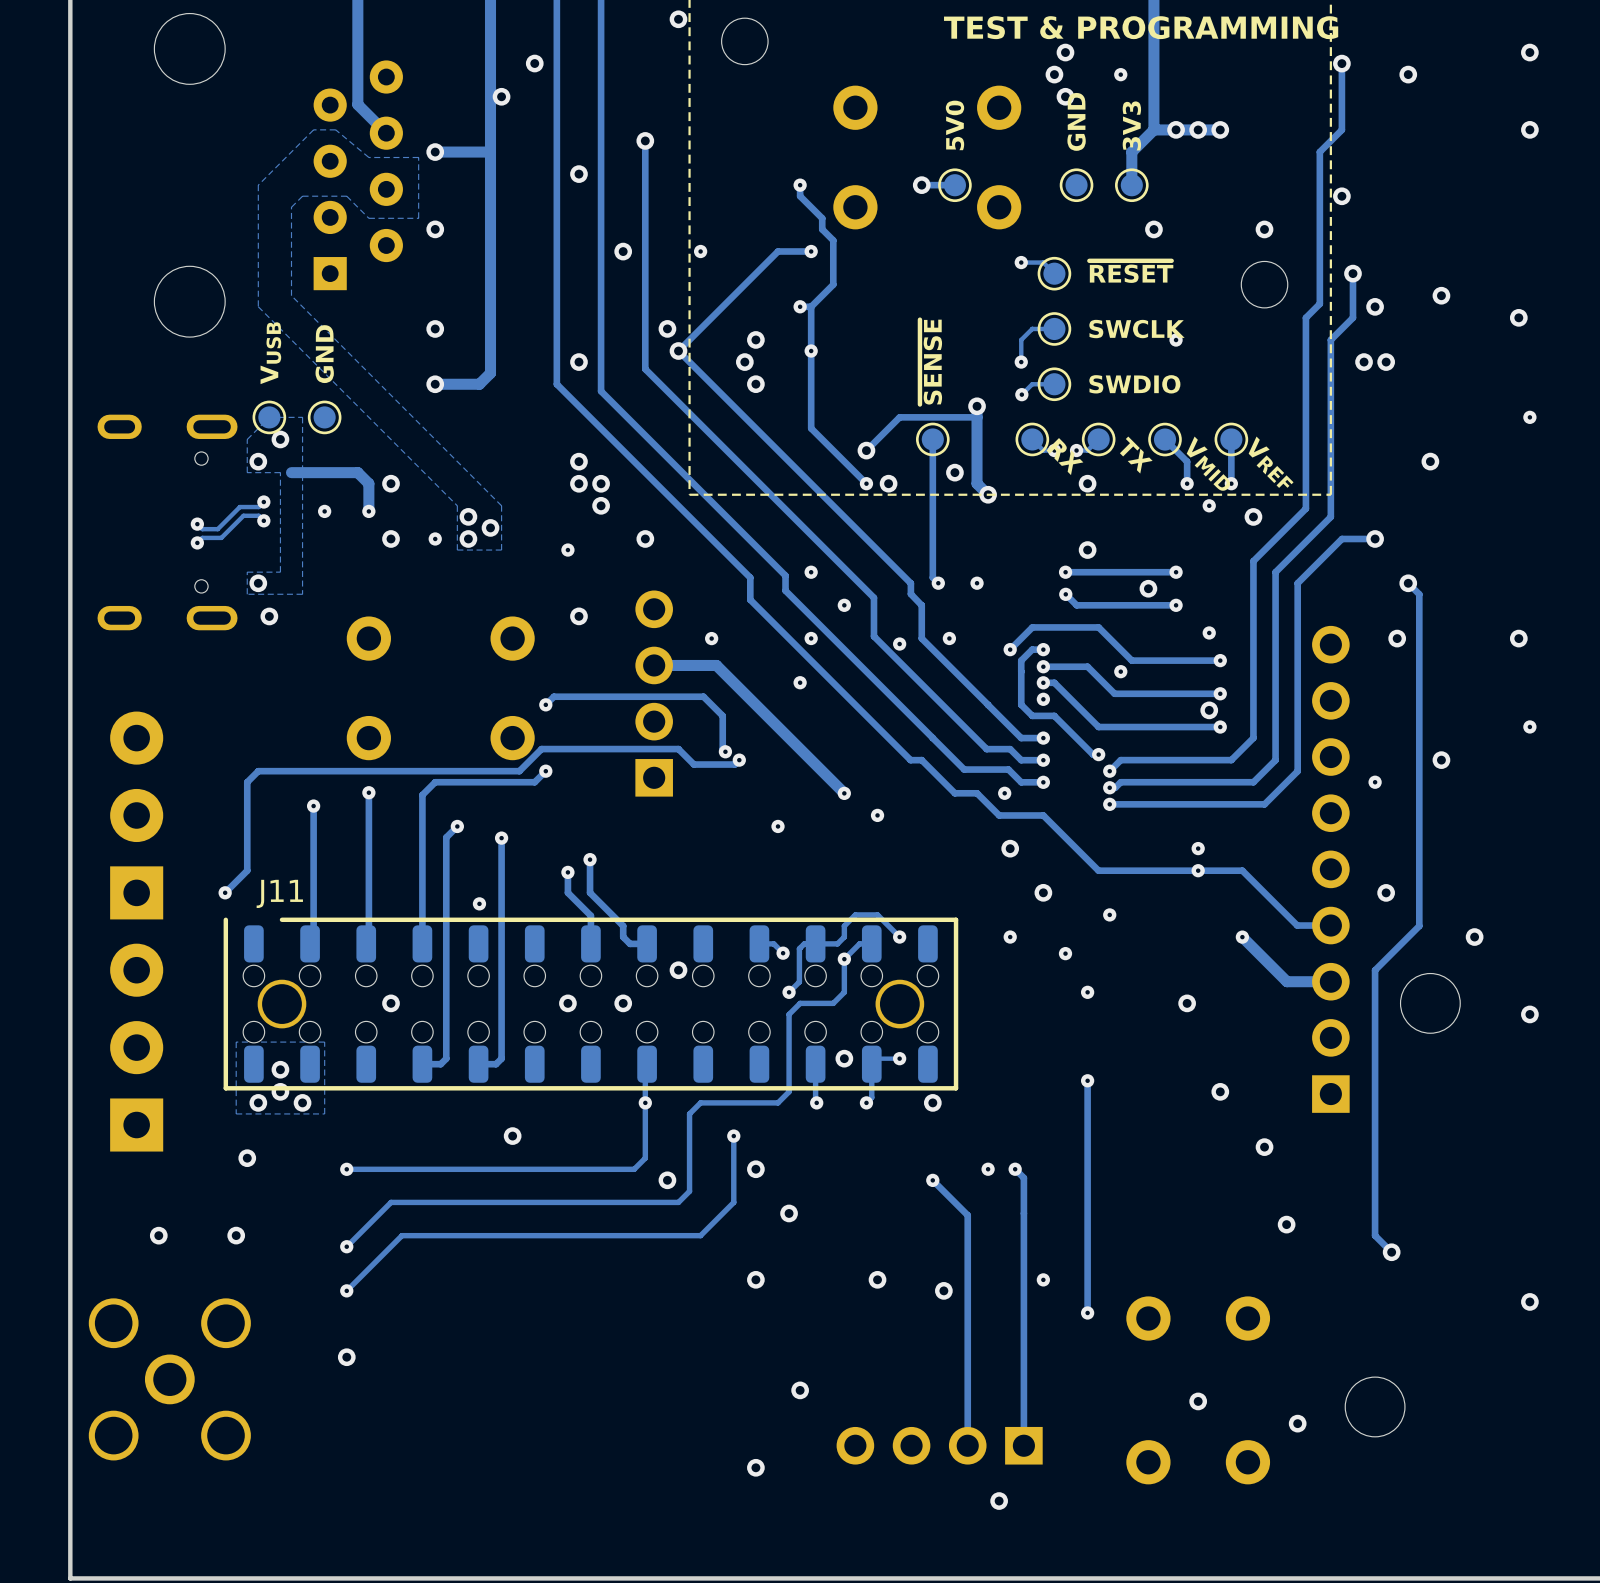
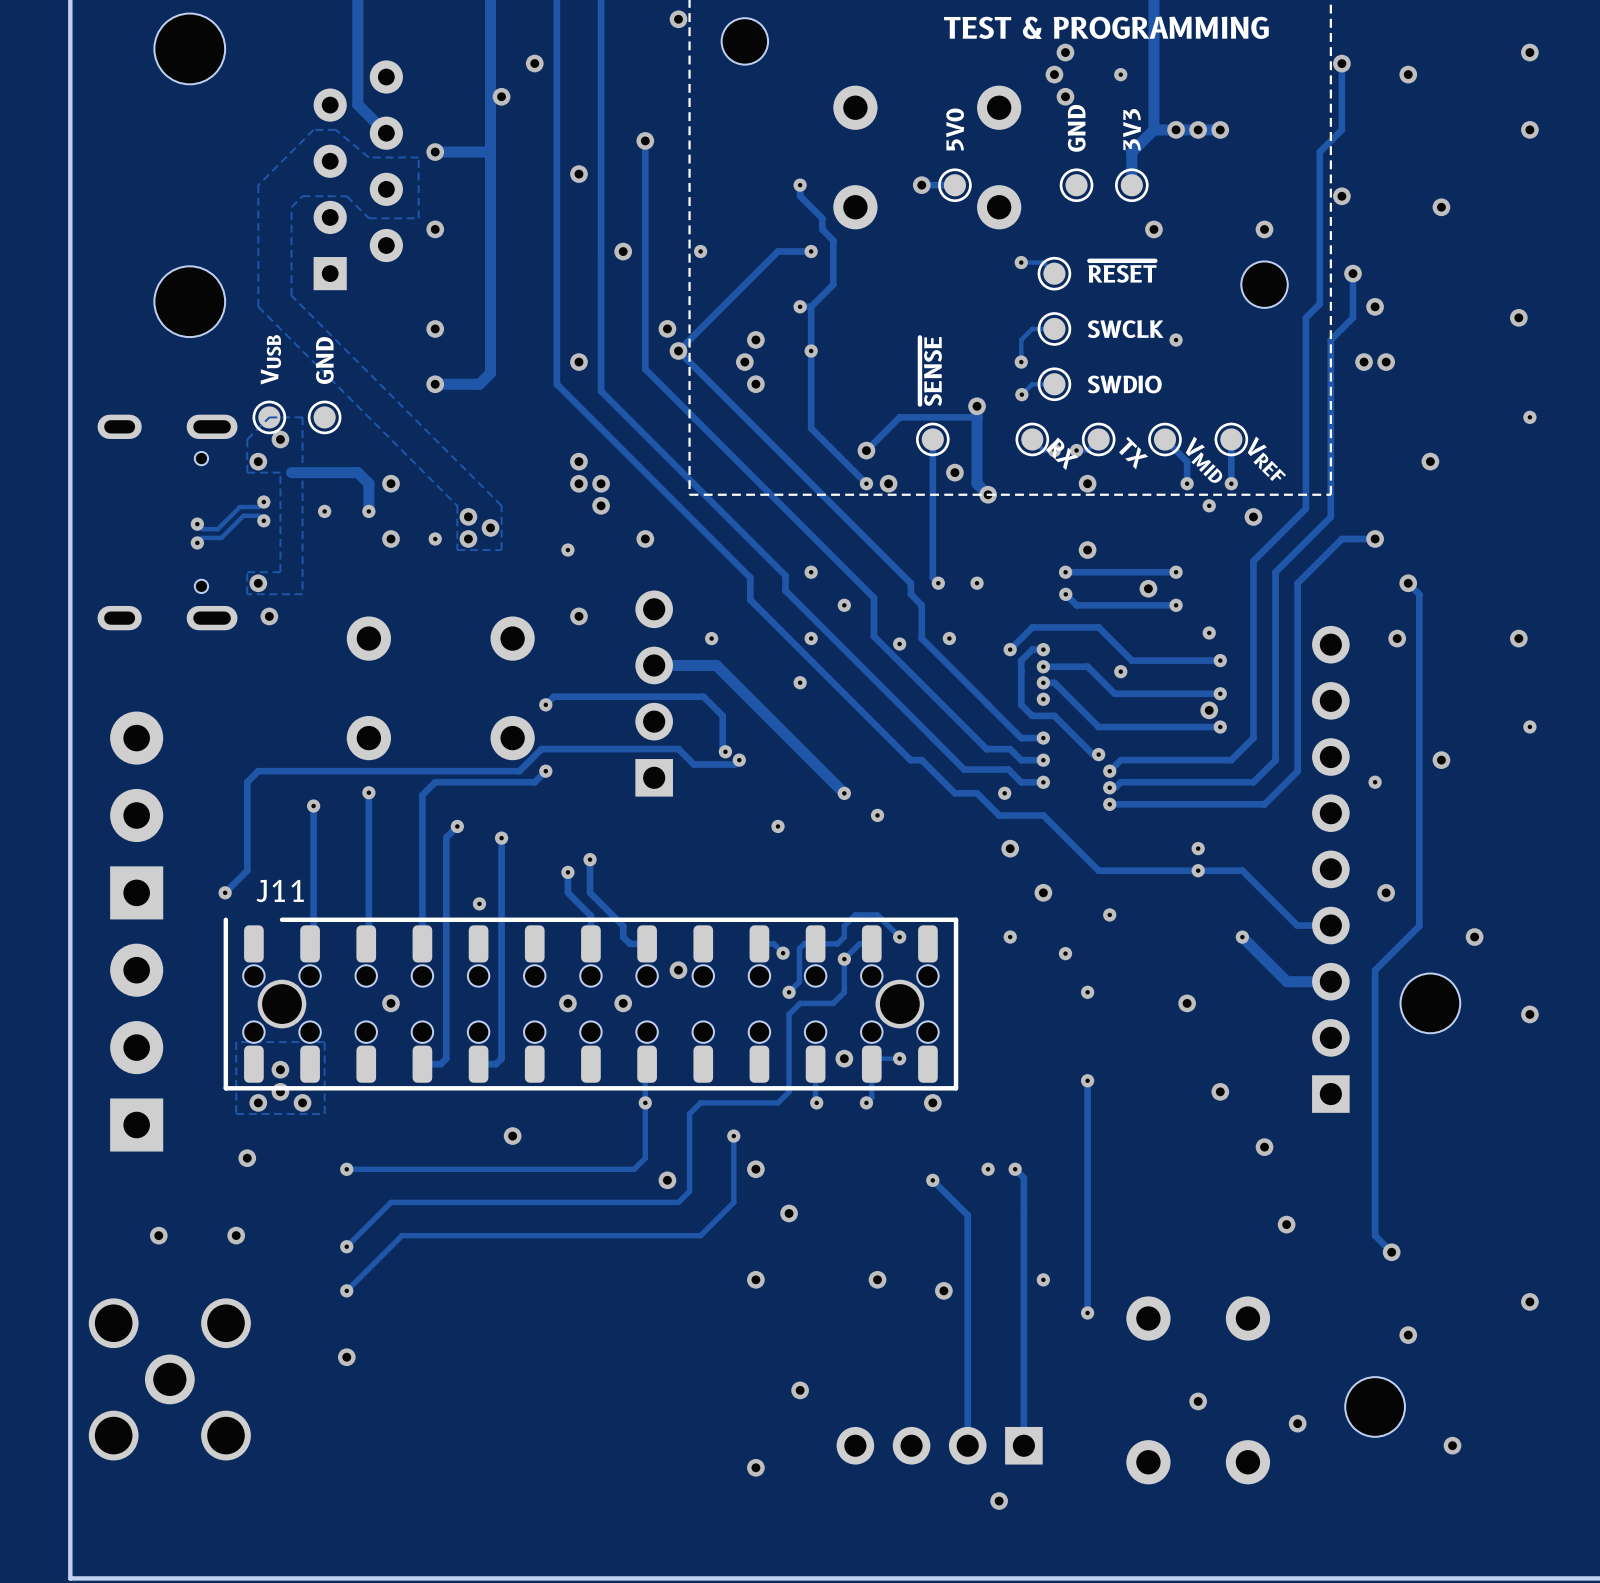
via position: (1441, 295) -> (1441, 207)
via: none -> (1408, 1335)
via: none -> (1452, 1445)

